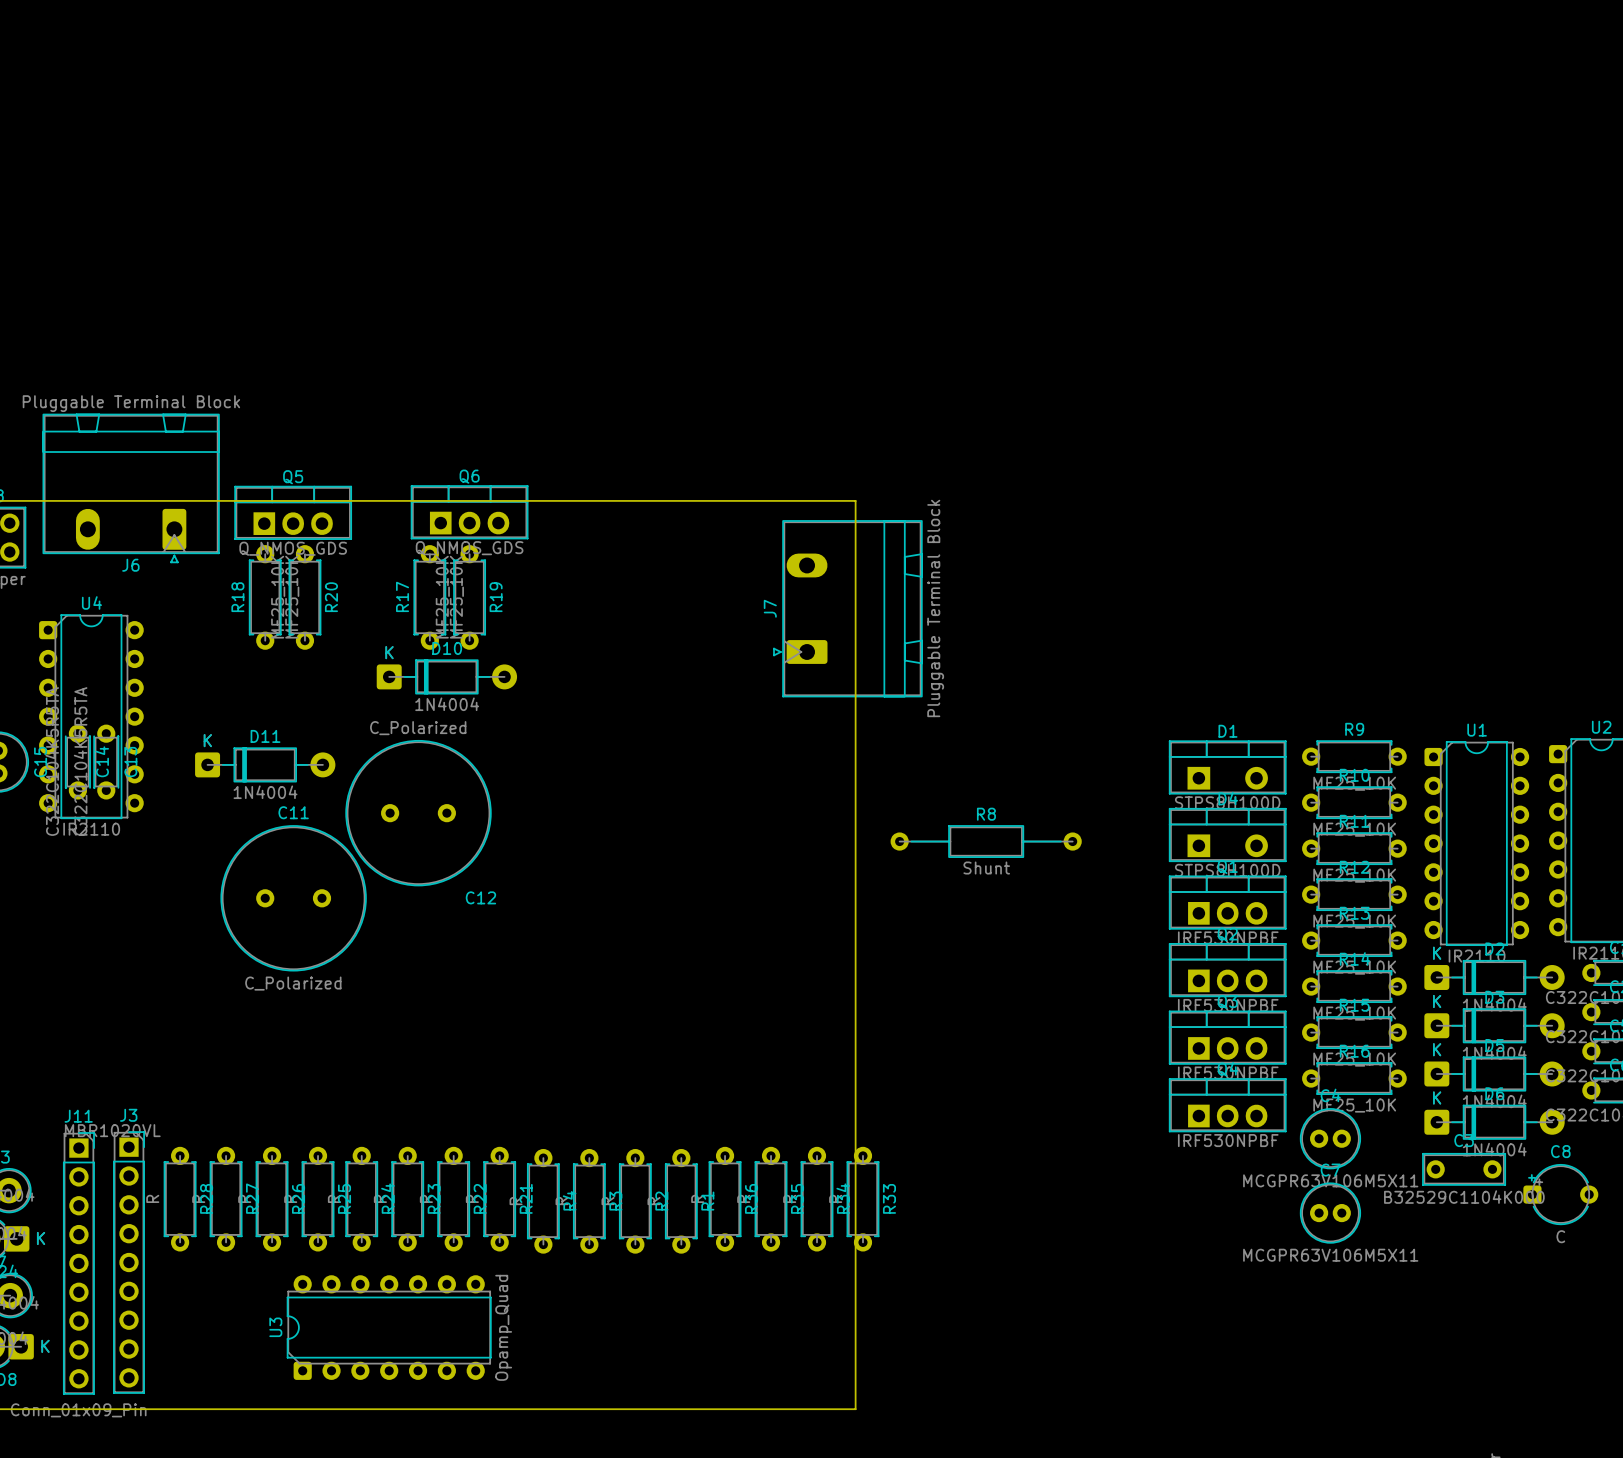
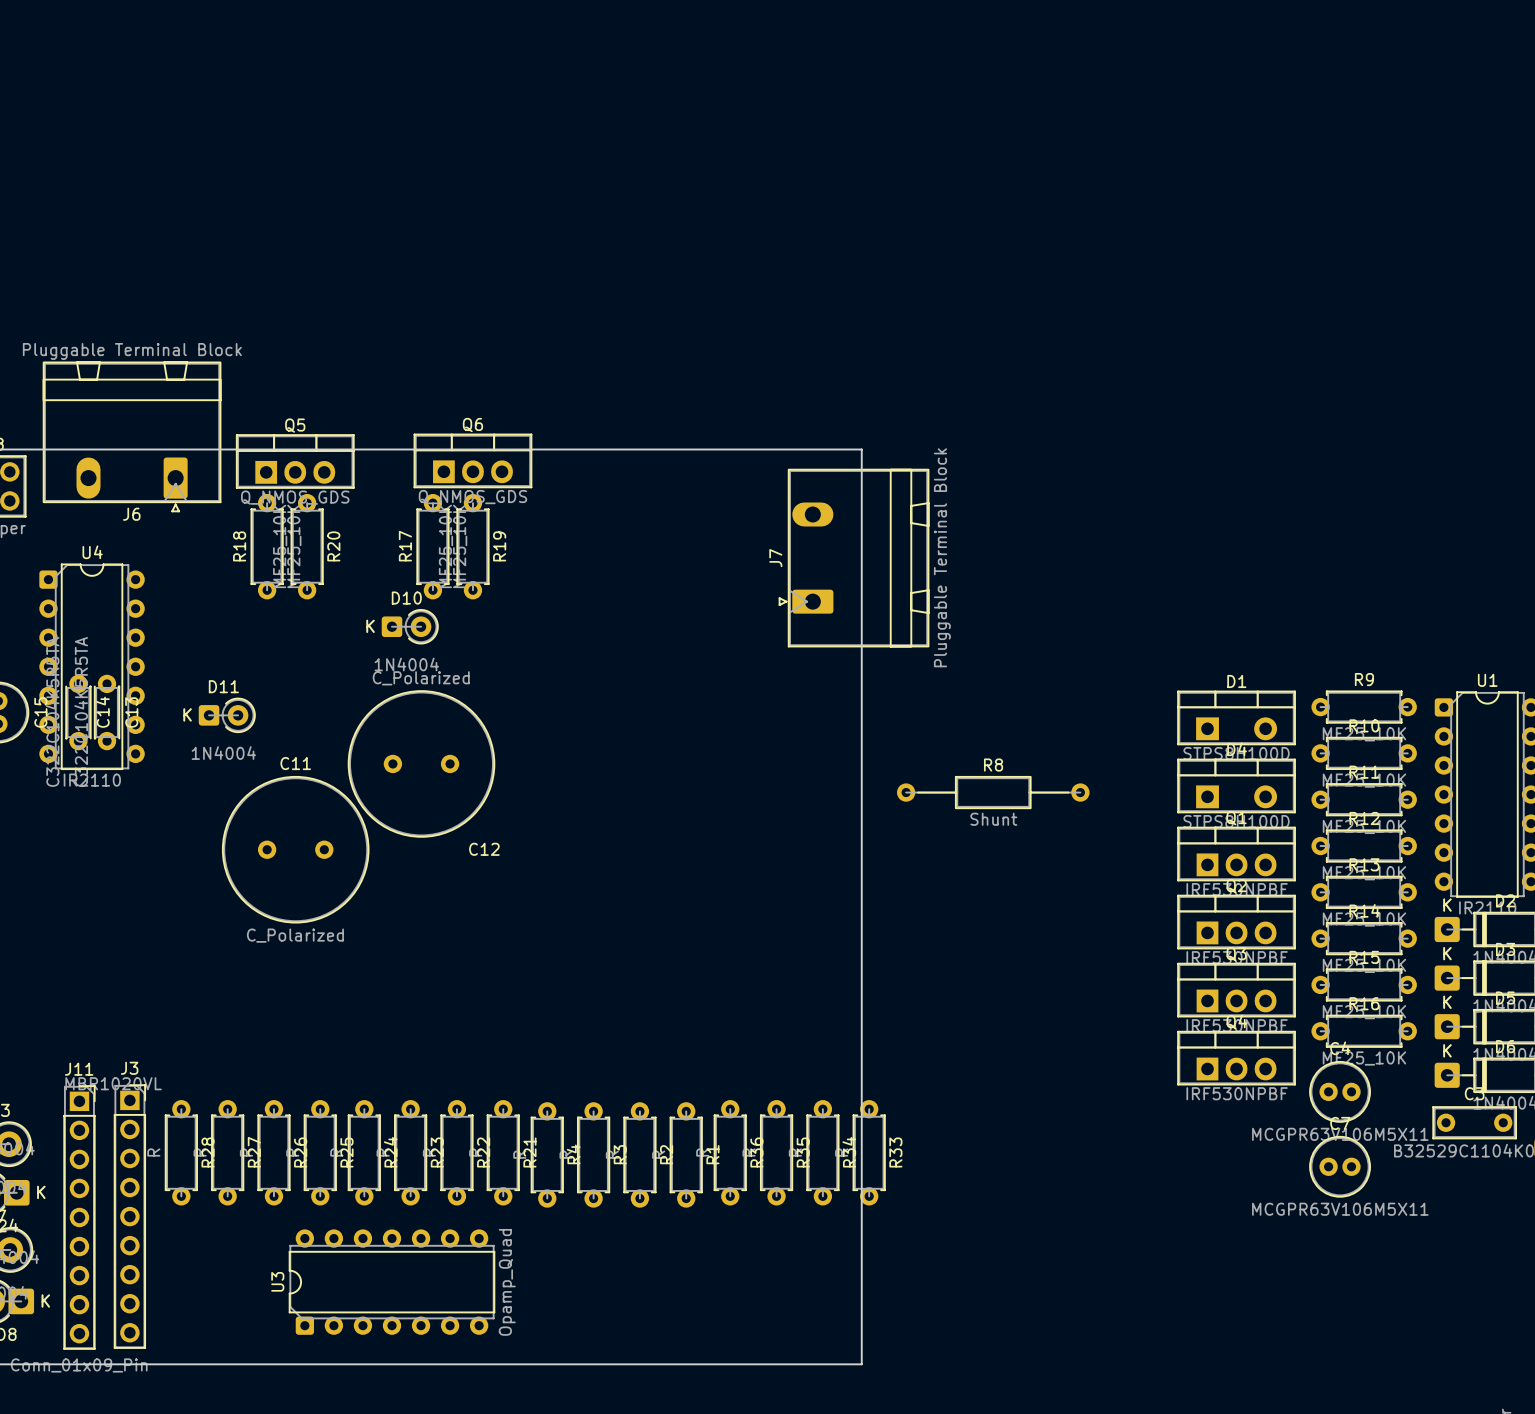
D10 footprint: [376, 659, 518, 695] -> [381, 609, 439, 645]
D11 footprint: [195, 747, 336, 783] -> [198, 697, 256, 733]

